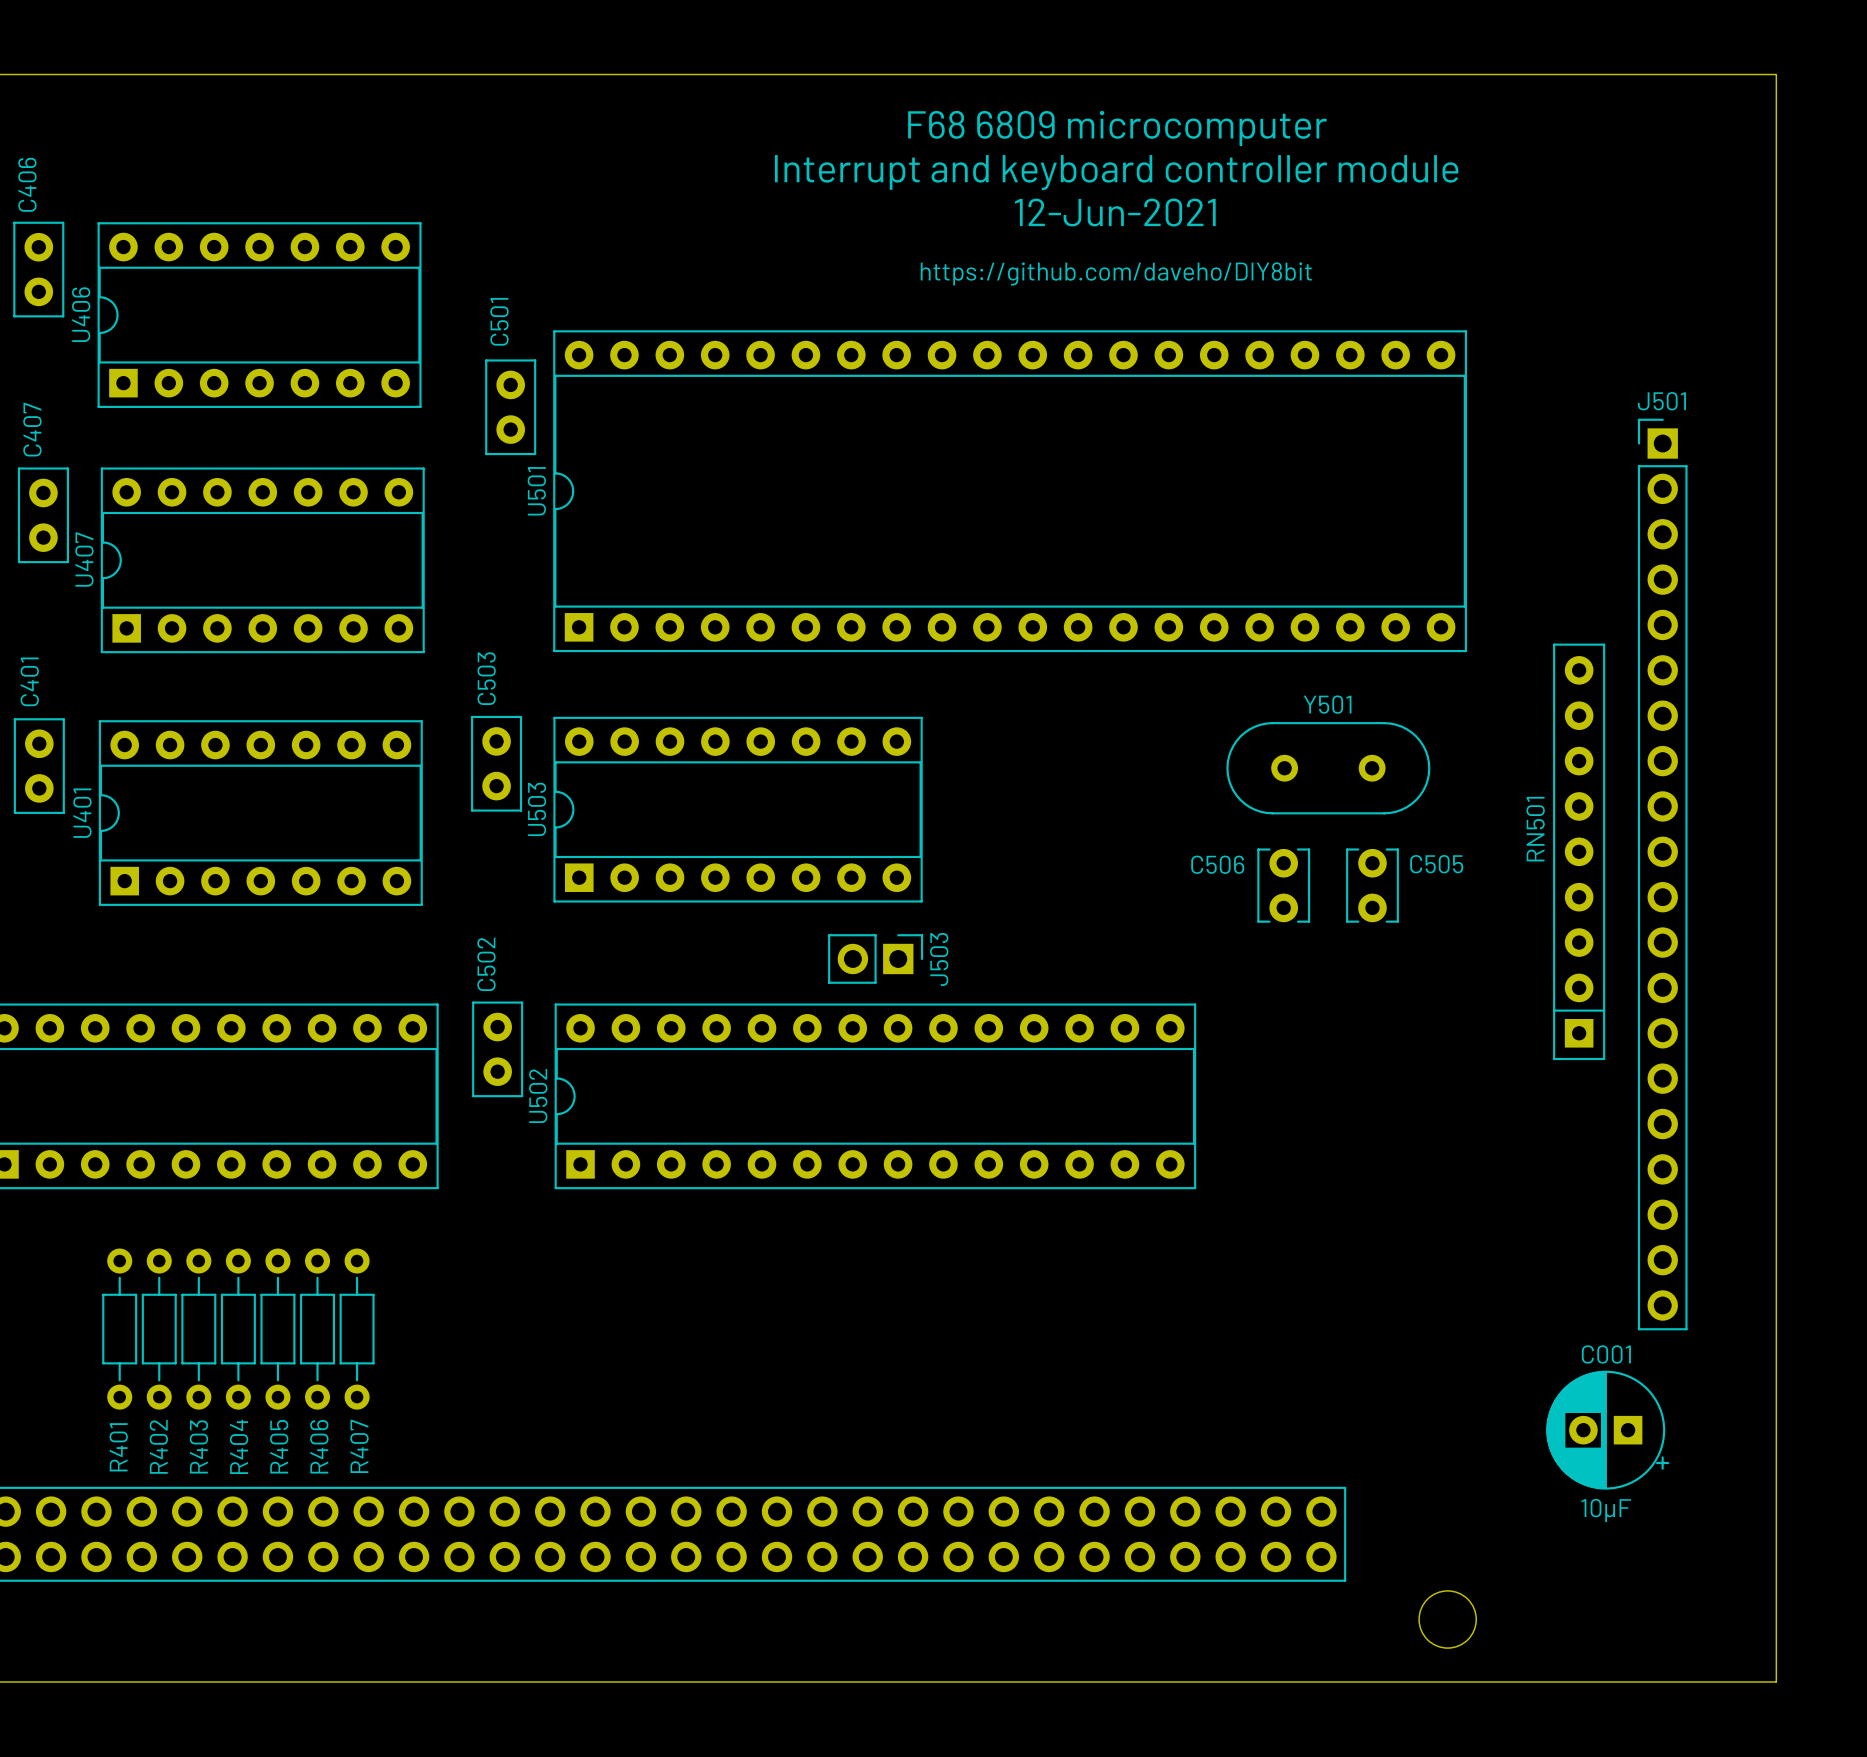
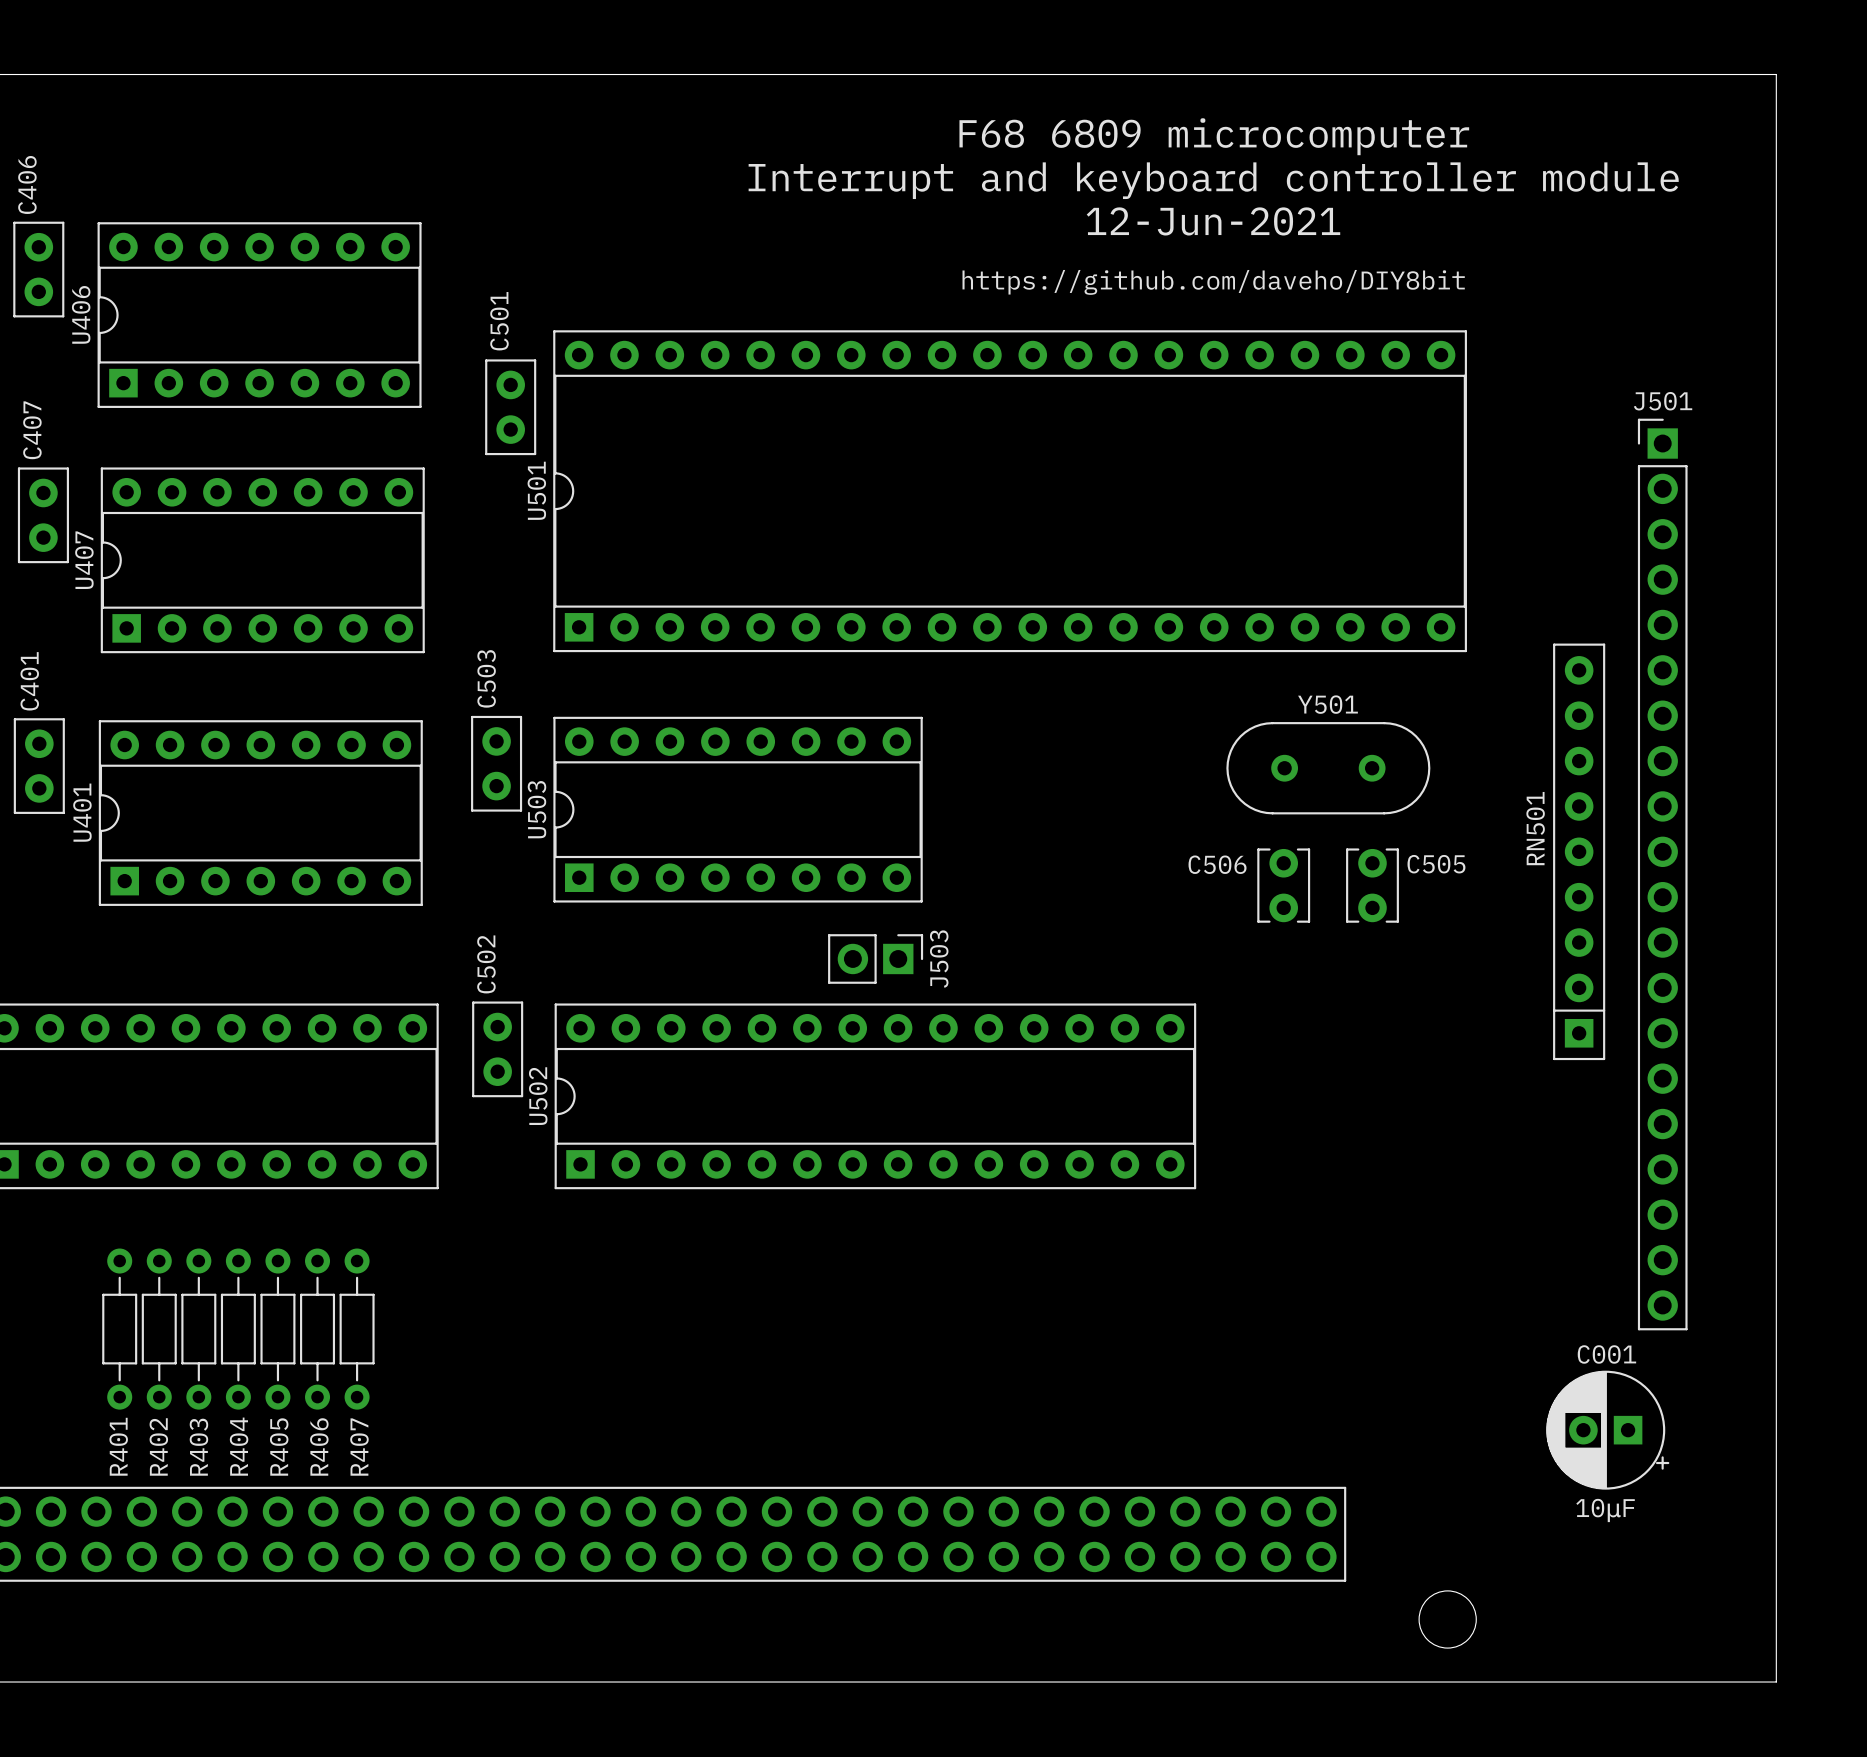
text position: F68 6809 microcomputer (1117, 128) -> F68 6809 microcomputer (1214, 136)
text position: Interrupt and keyboard controller module (1116, 172) -> Interrupt and keyboard controller module (1213, 180)
text position: 12-Jun-2021 (1115, 212) -> 12-Jun-2021 (1213, 221)
text position: https://github.com/daveho/DIY8bit (1116, 273) -> https://github.com/daveho/DIY8bit (1213, 282)

